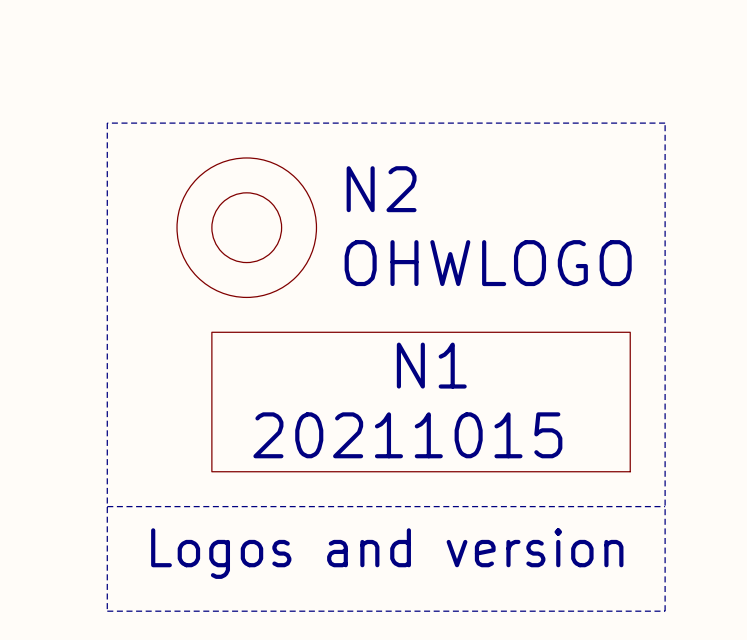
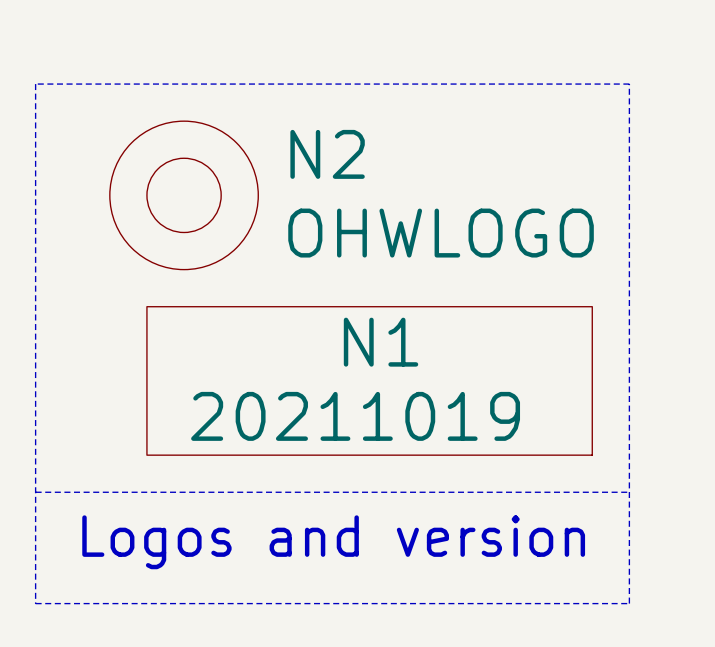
N1 value: 20211015 (407, 435) -> 20211019 (355, 416)

